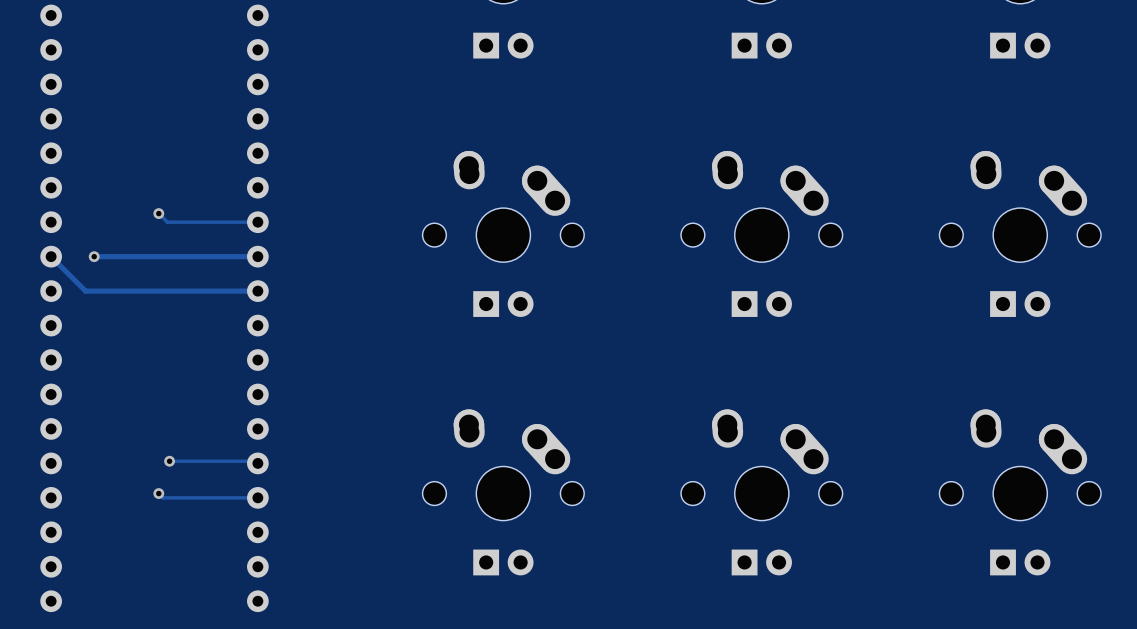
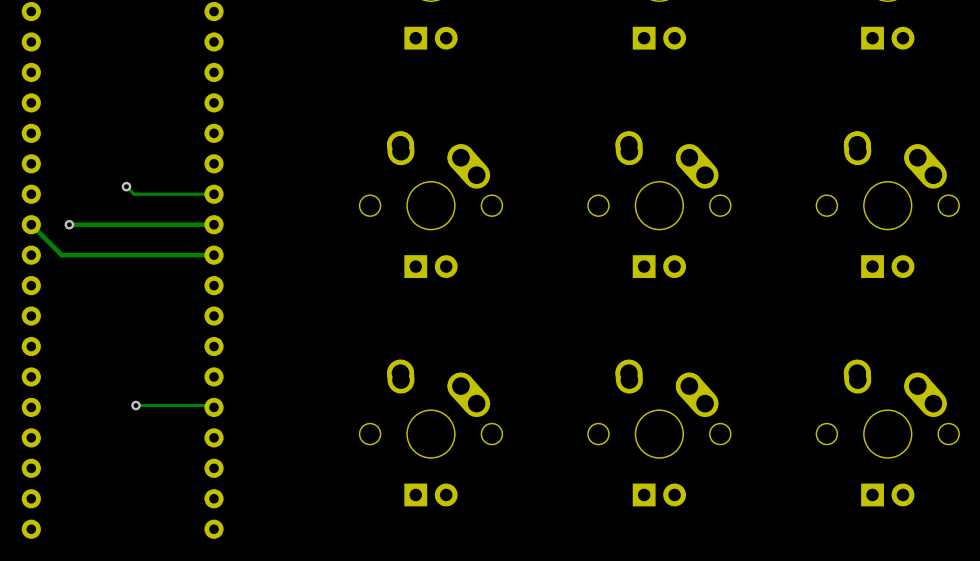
track: (158, 493) (163, 497) (257, 497) -> none
via: (158, 493) -> none

